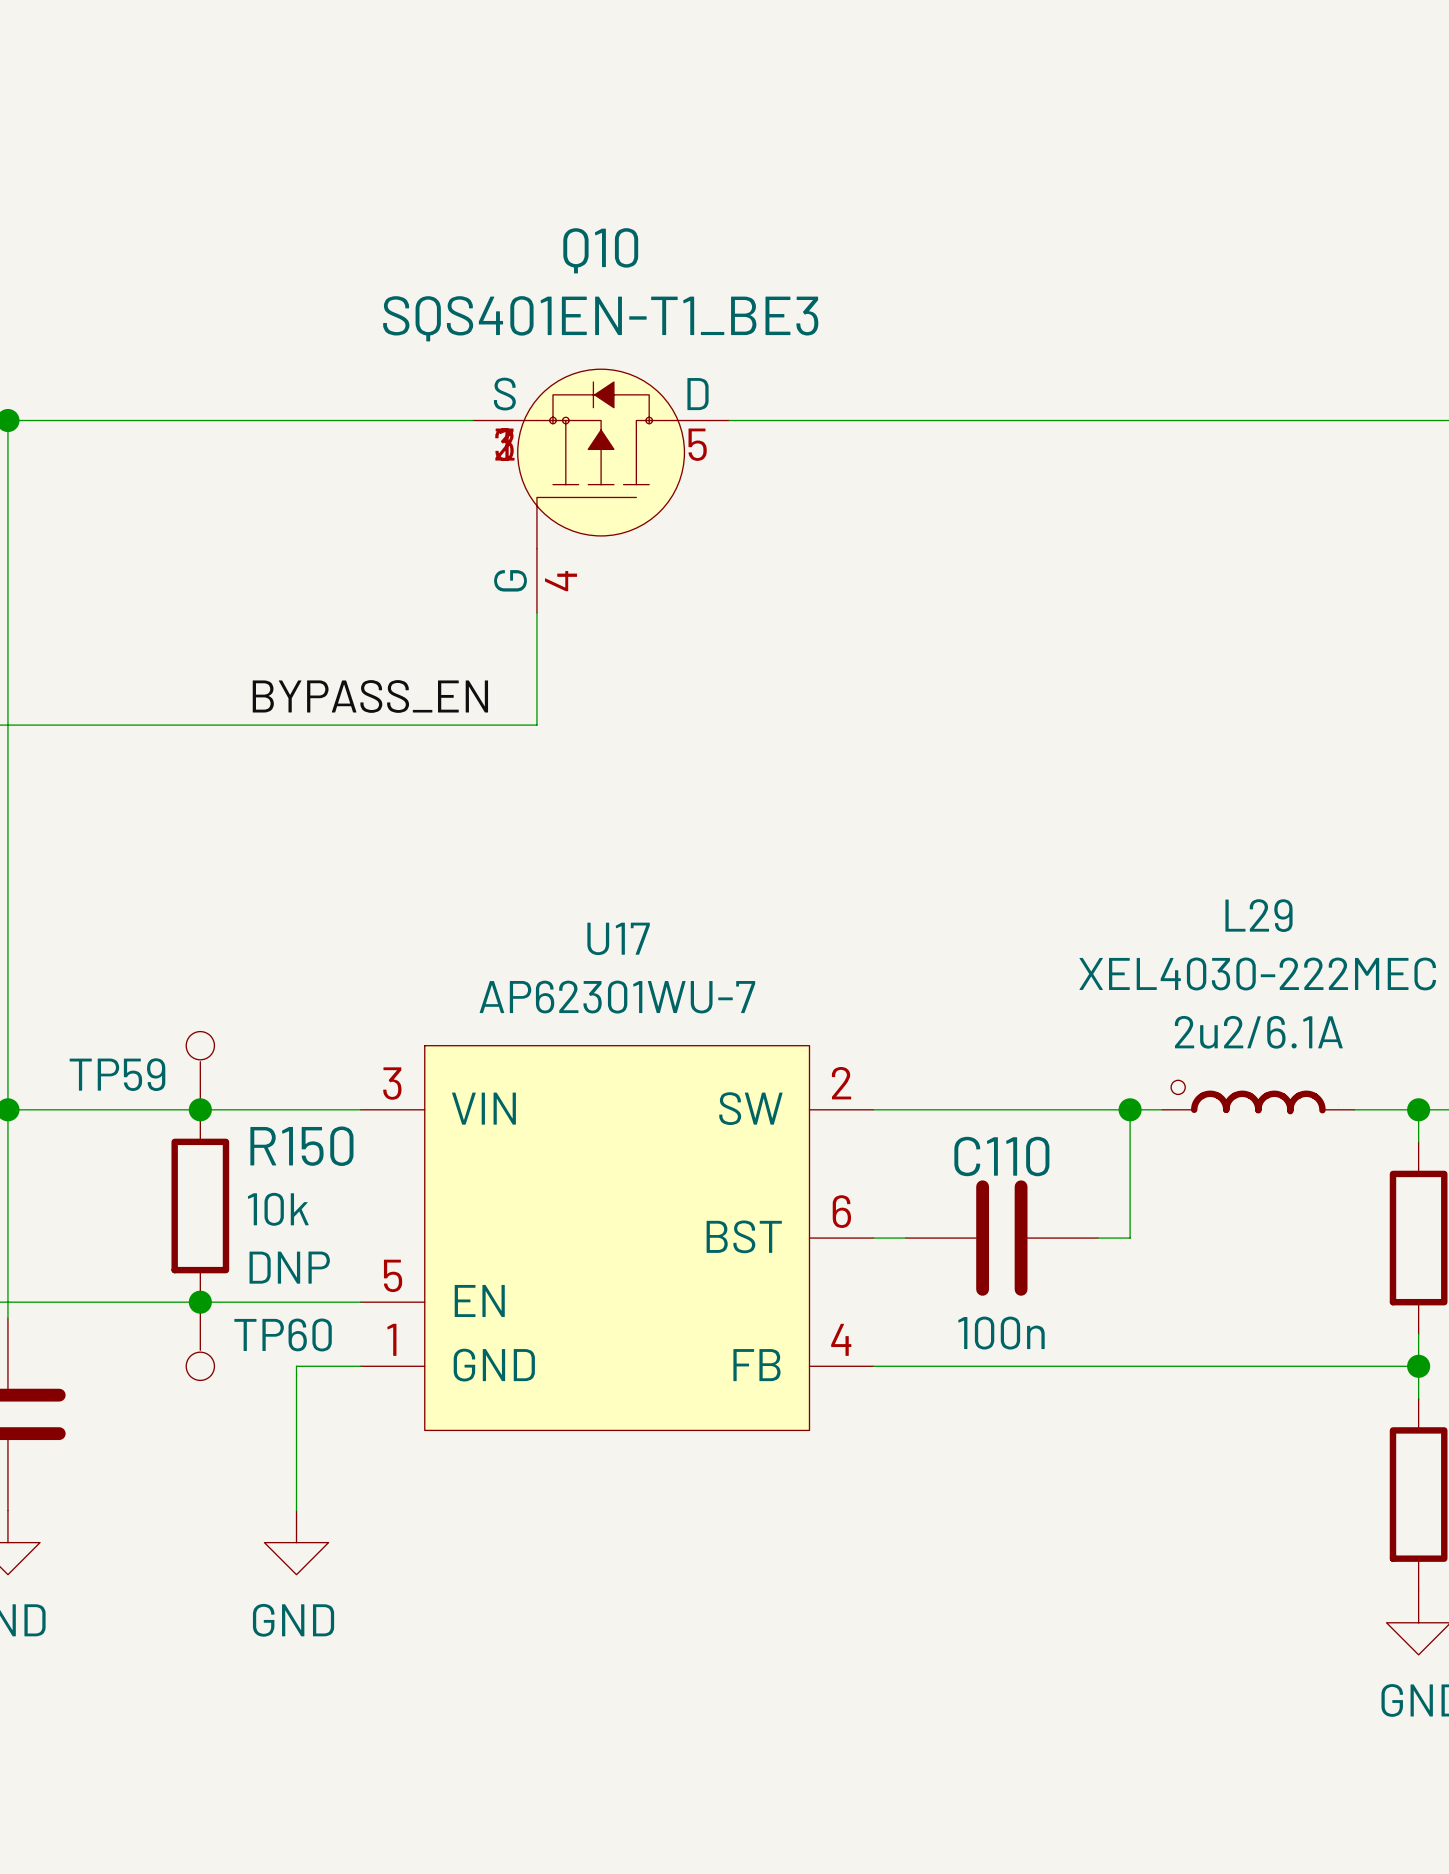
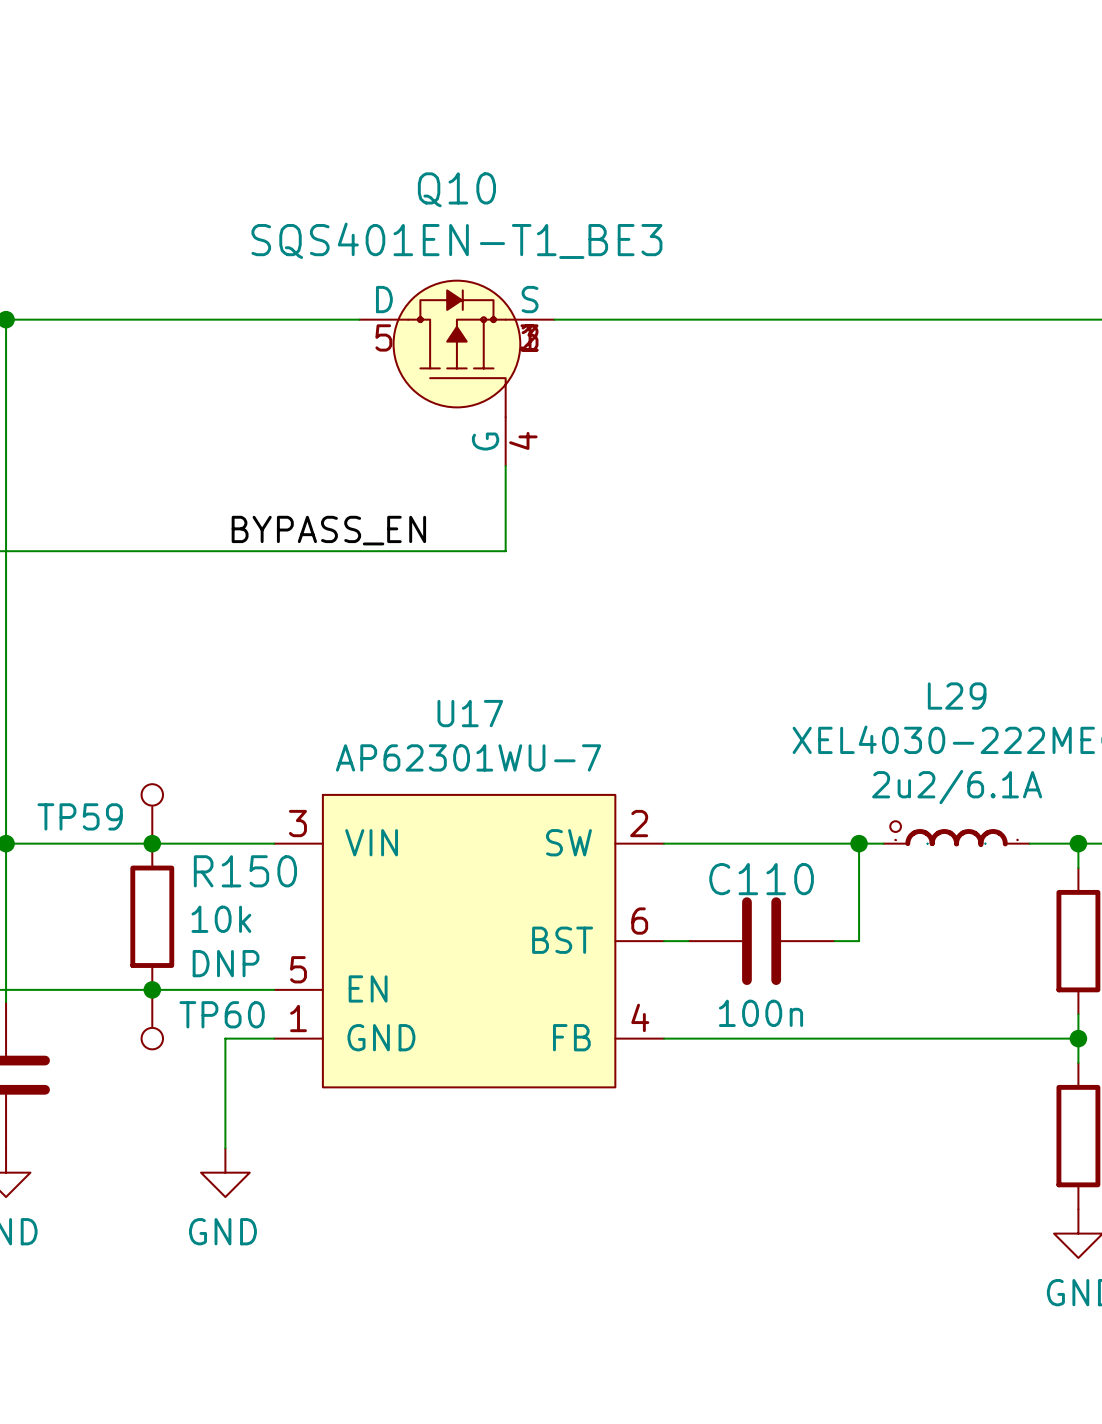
Q10 flip: as is (601, 458) -> left-right (456, 348)
wire: (536, 612) (536, 725) -> (505, 465) (505, 551) (408, 551)
label position: BYPASS_EN (370, 696) -> BYPASS_EN (328, 530)

